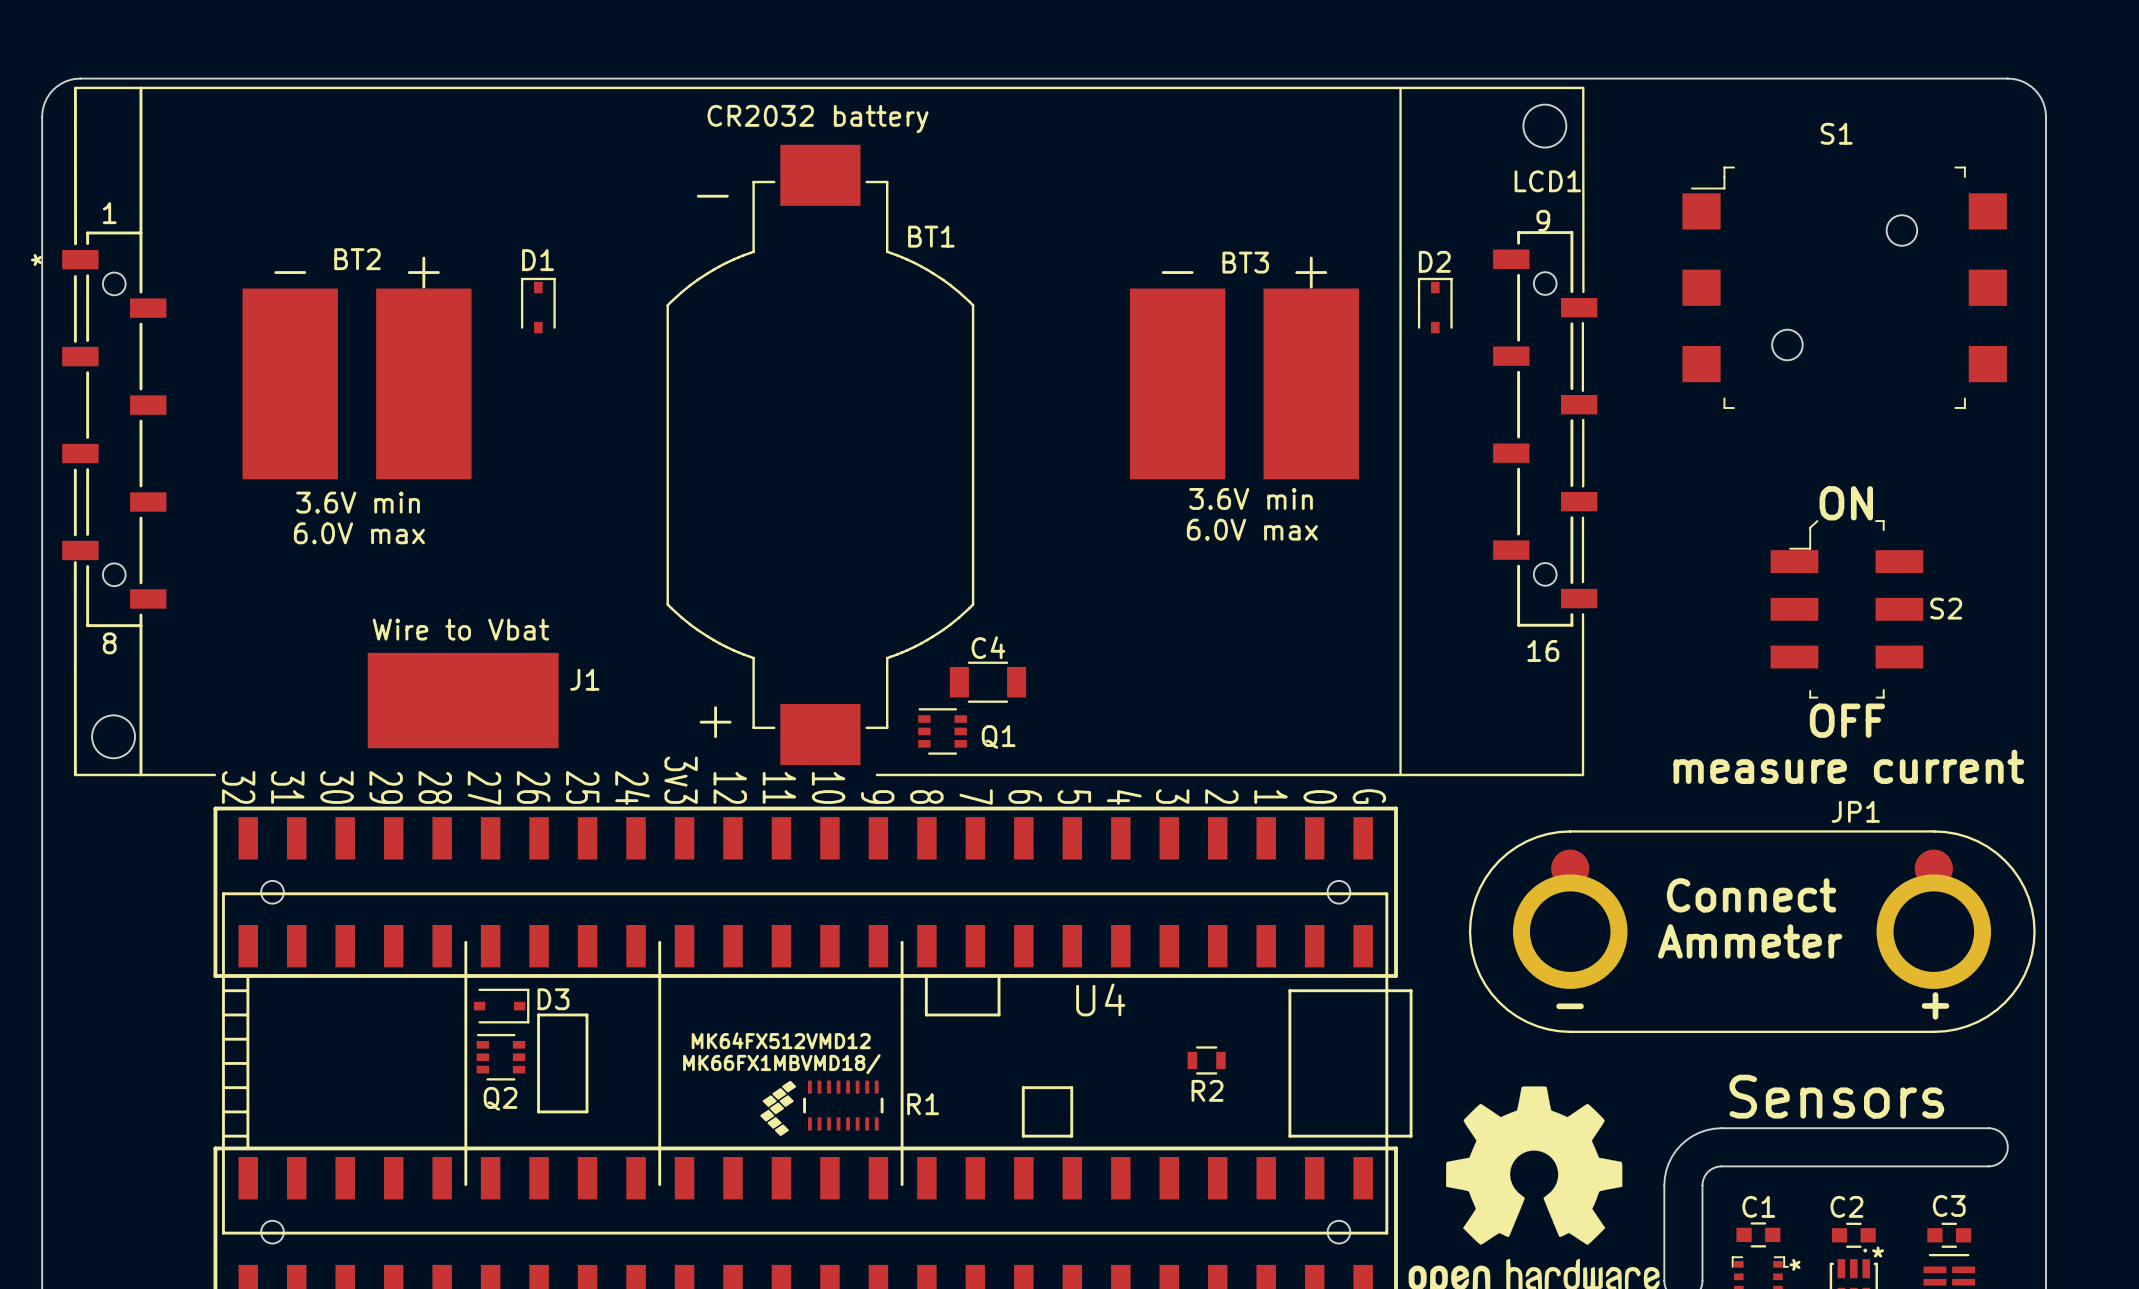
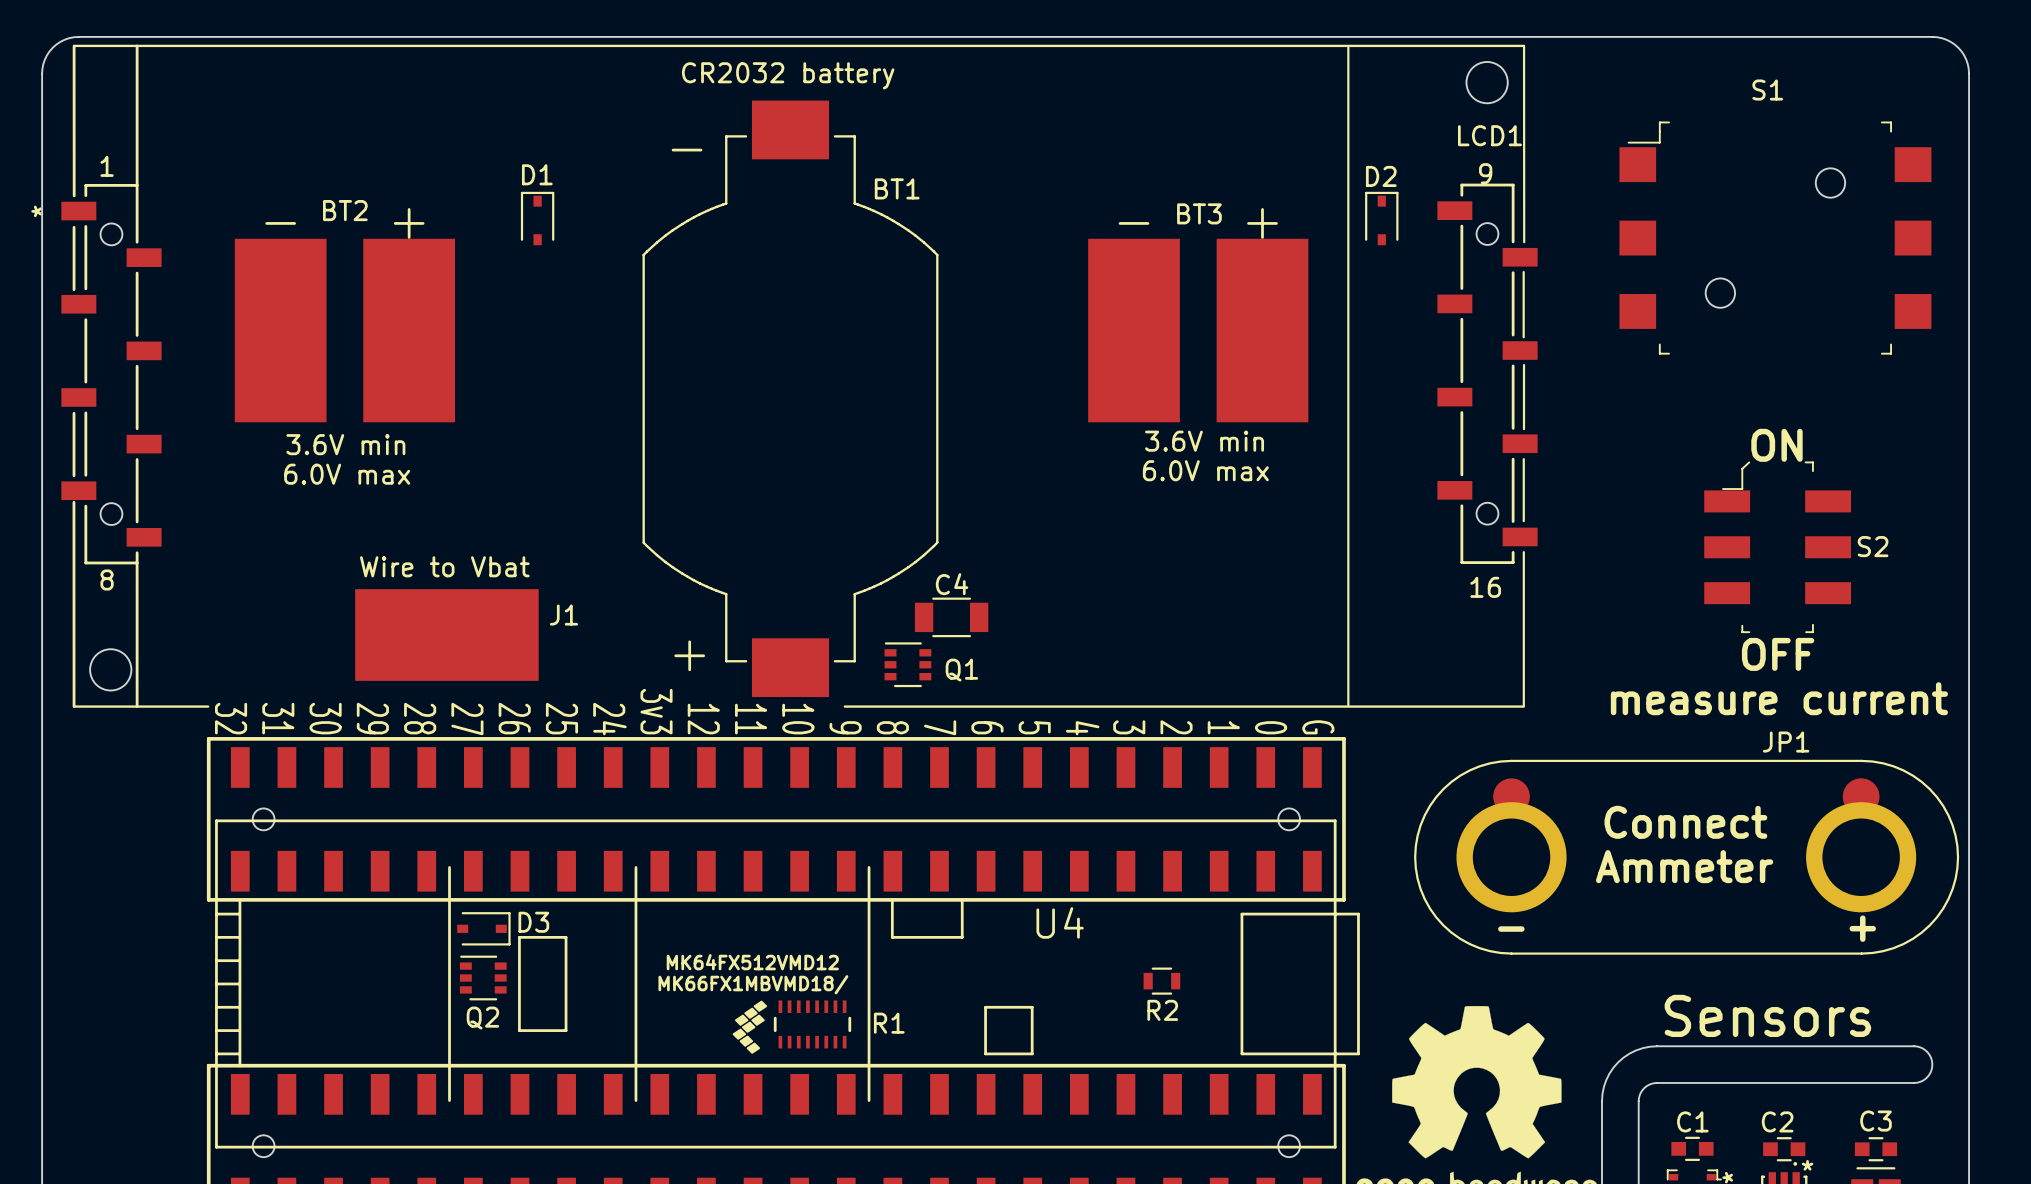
D1 position: (538, 305) -> (537, 218)
D2 position: (1435, 305) -> (1381, 218)

